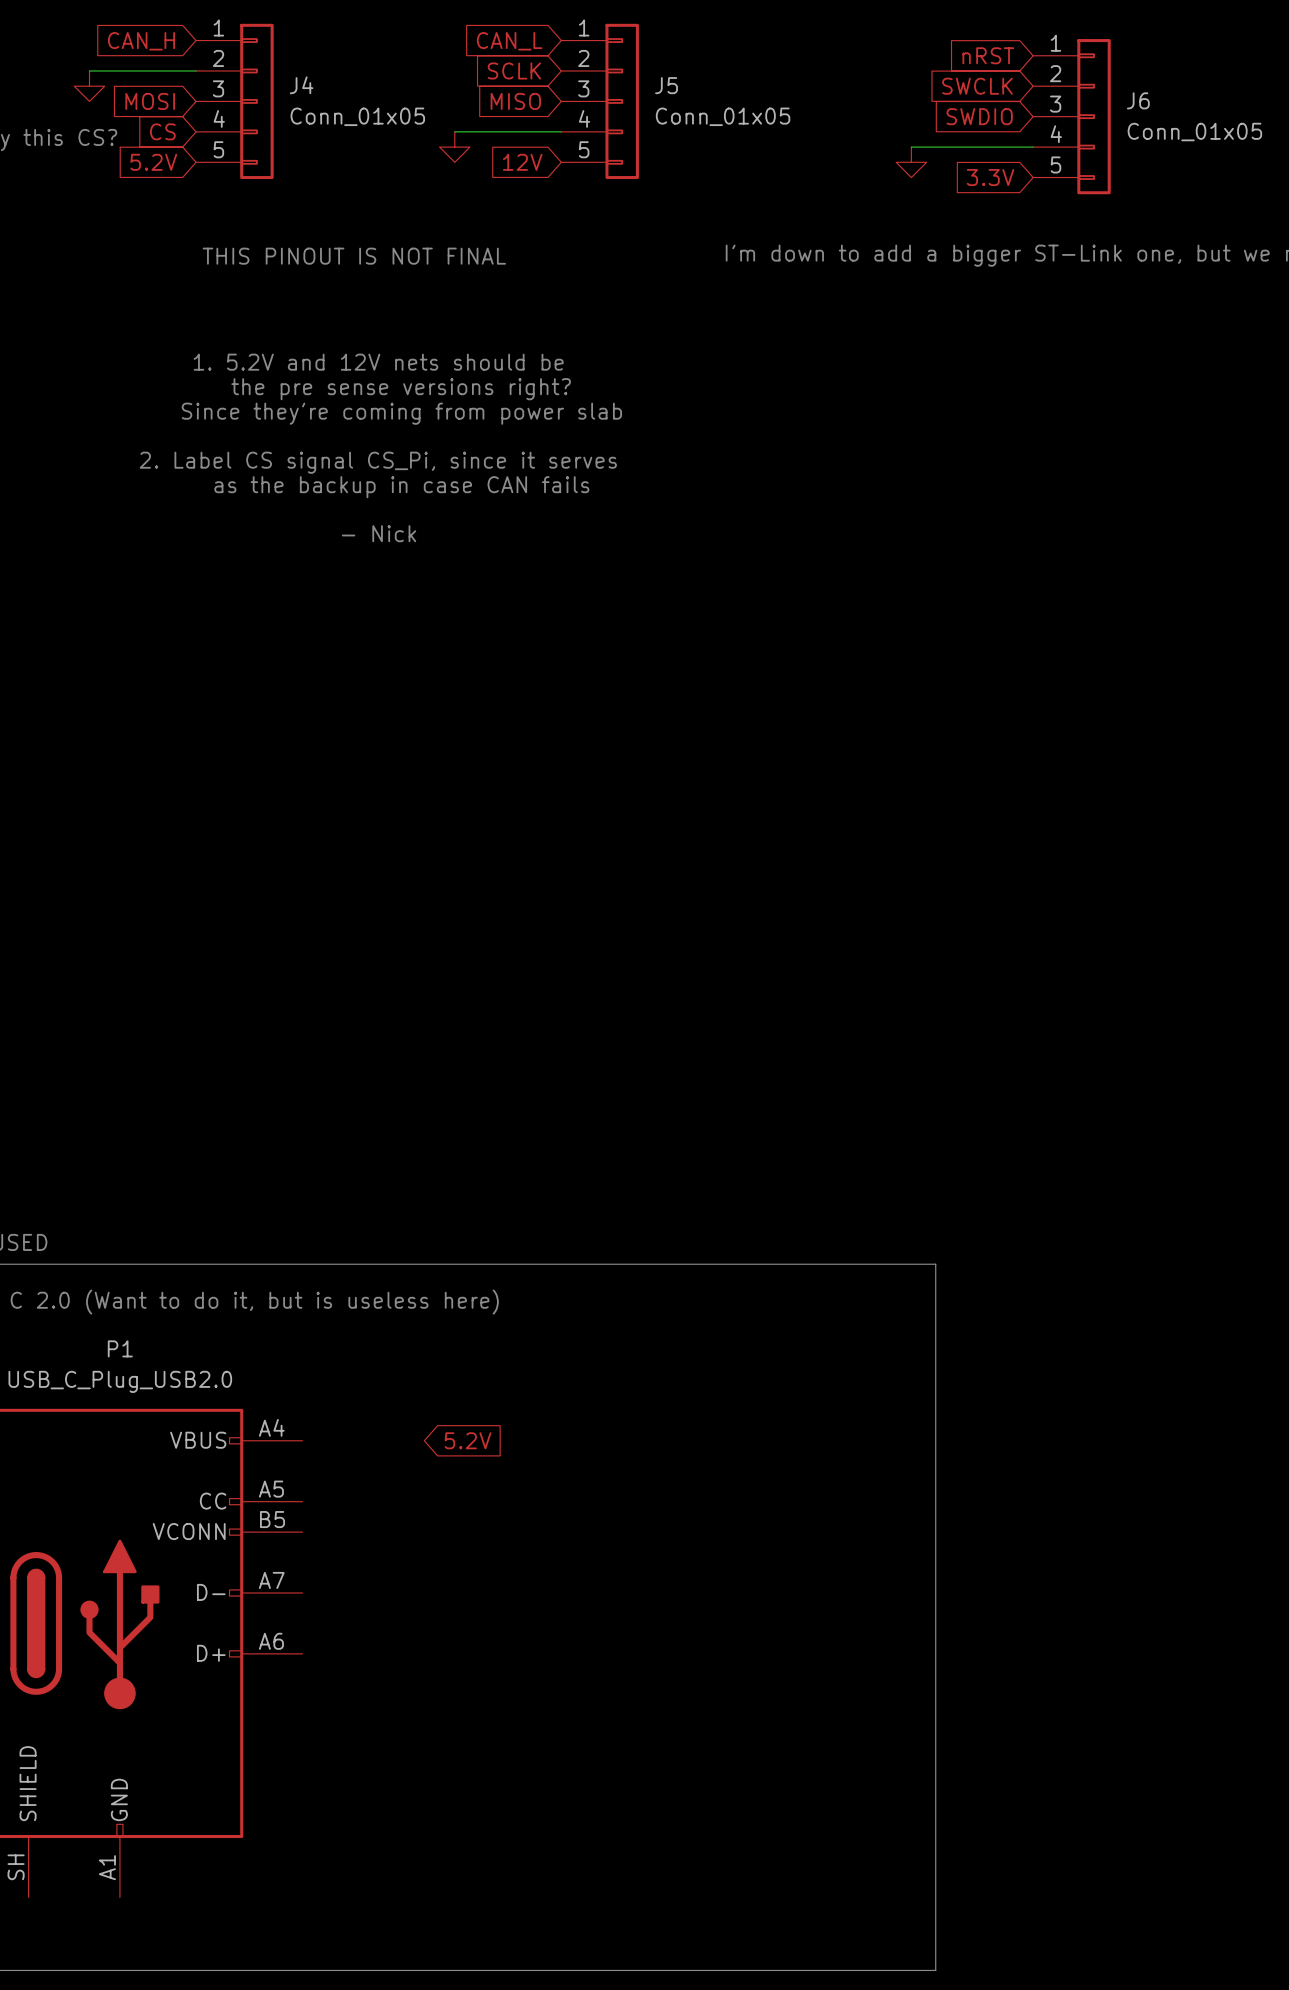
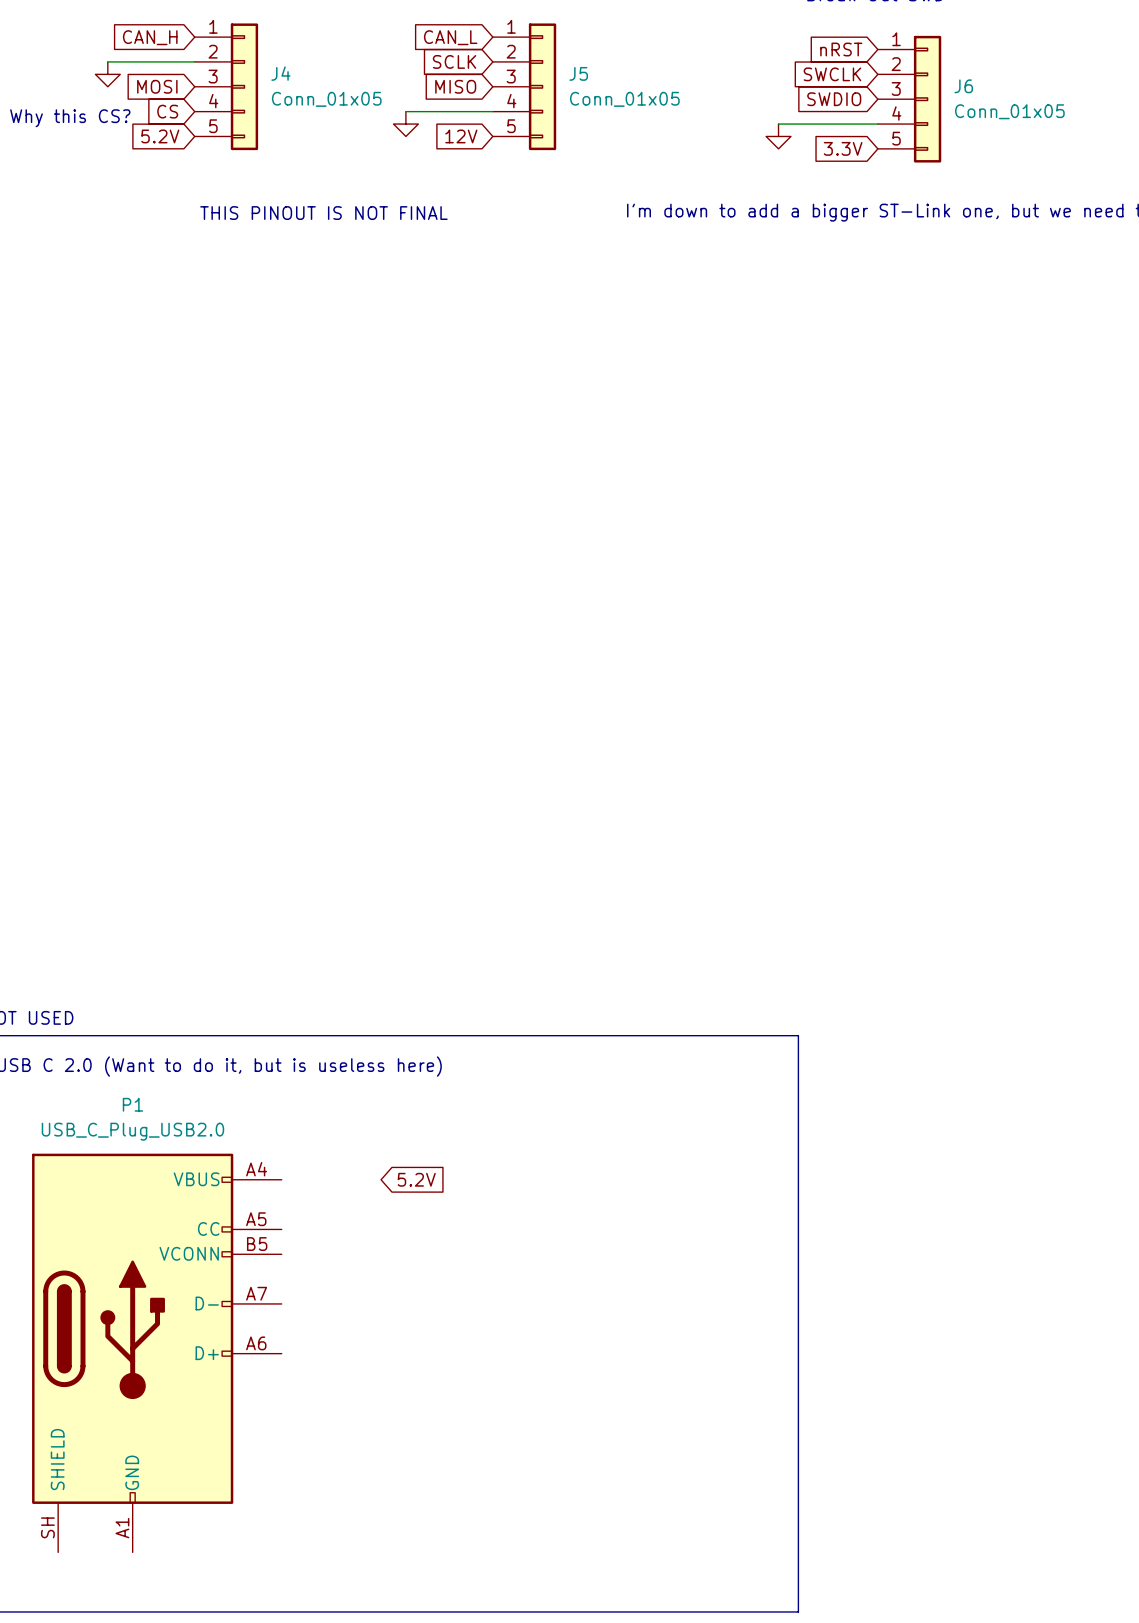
text: 1. 5.2V and 12V nets should be (378, 362) -> none
text: the pre sense versions right? (401, 389) -> none
text: Since they're coming from power slab (401, 413) -> none
text: 2. Label CS signal CS_Pi, since it serves (378, 462) -> none
text: as the backup in case CAN fails (401, 487) -> none
text: - Nick (379, 533) -> none

